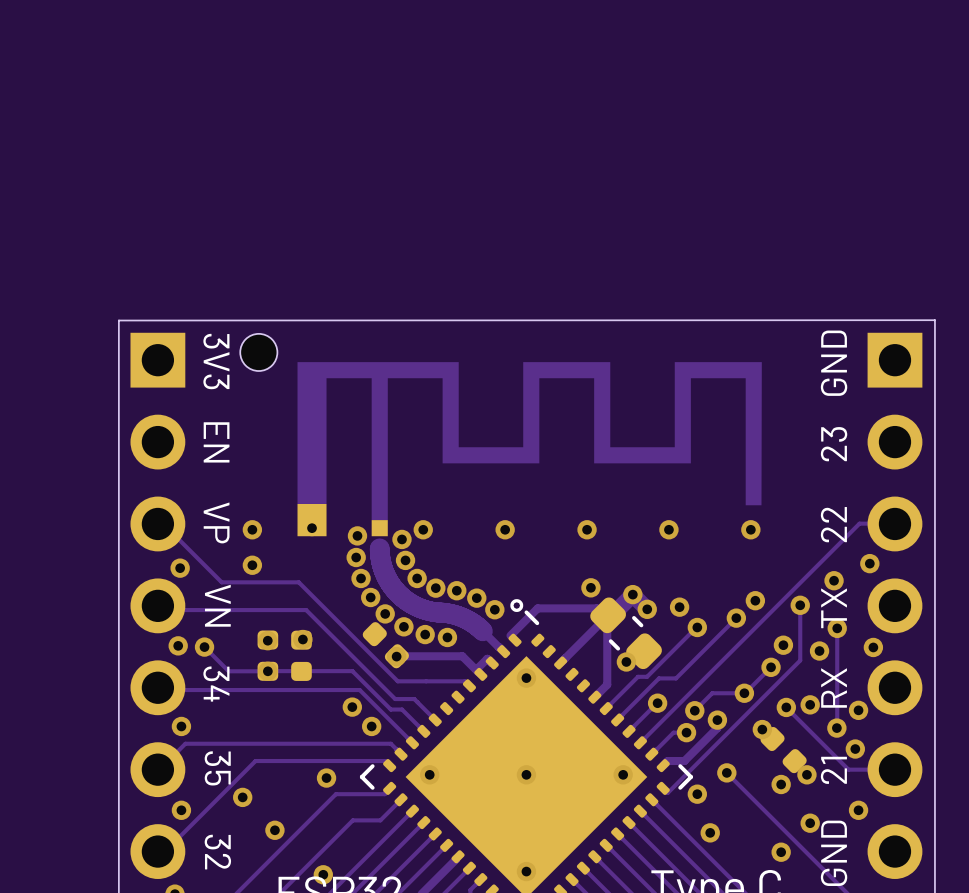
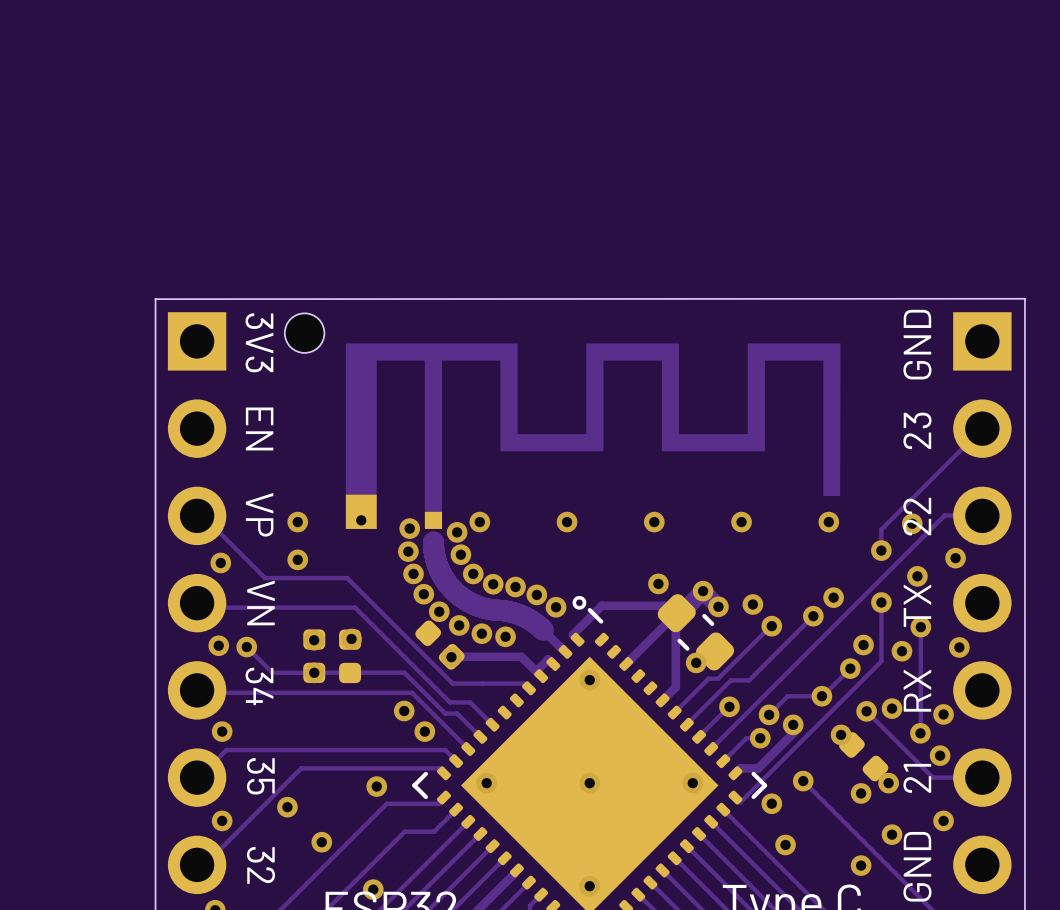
track: none -> (982, 428) (881, 529) (881, 550)
via: none -> (912, 523)
via: none -> (881, 550)

